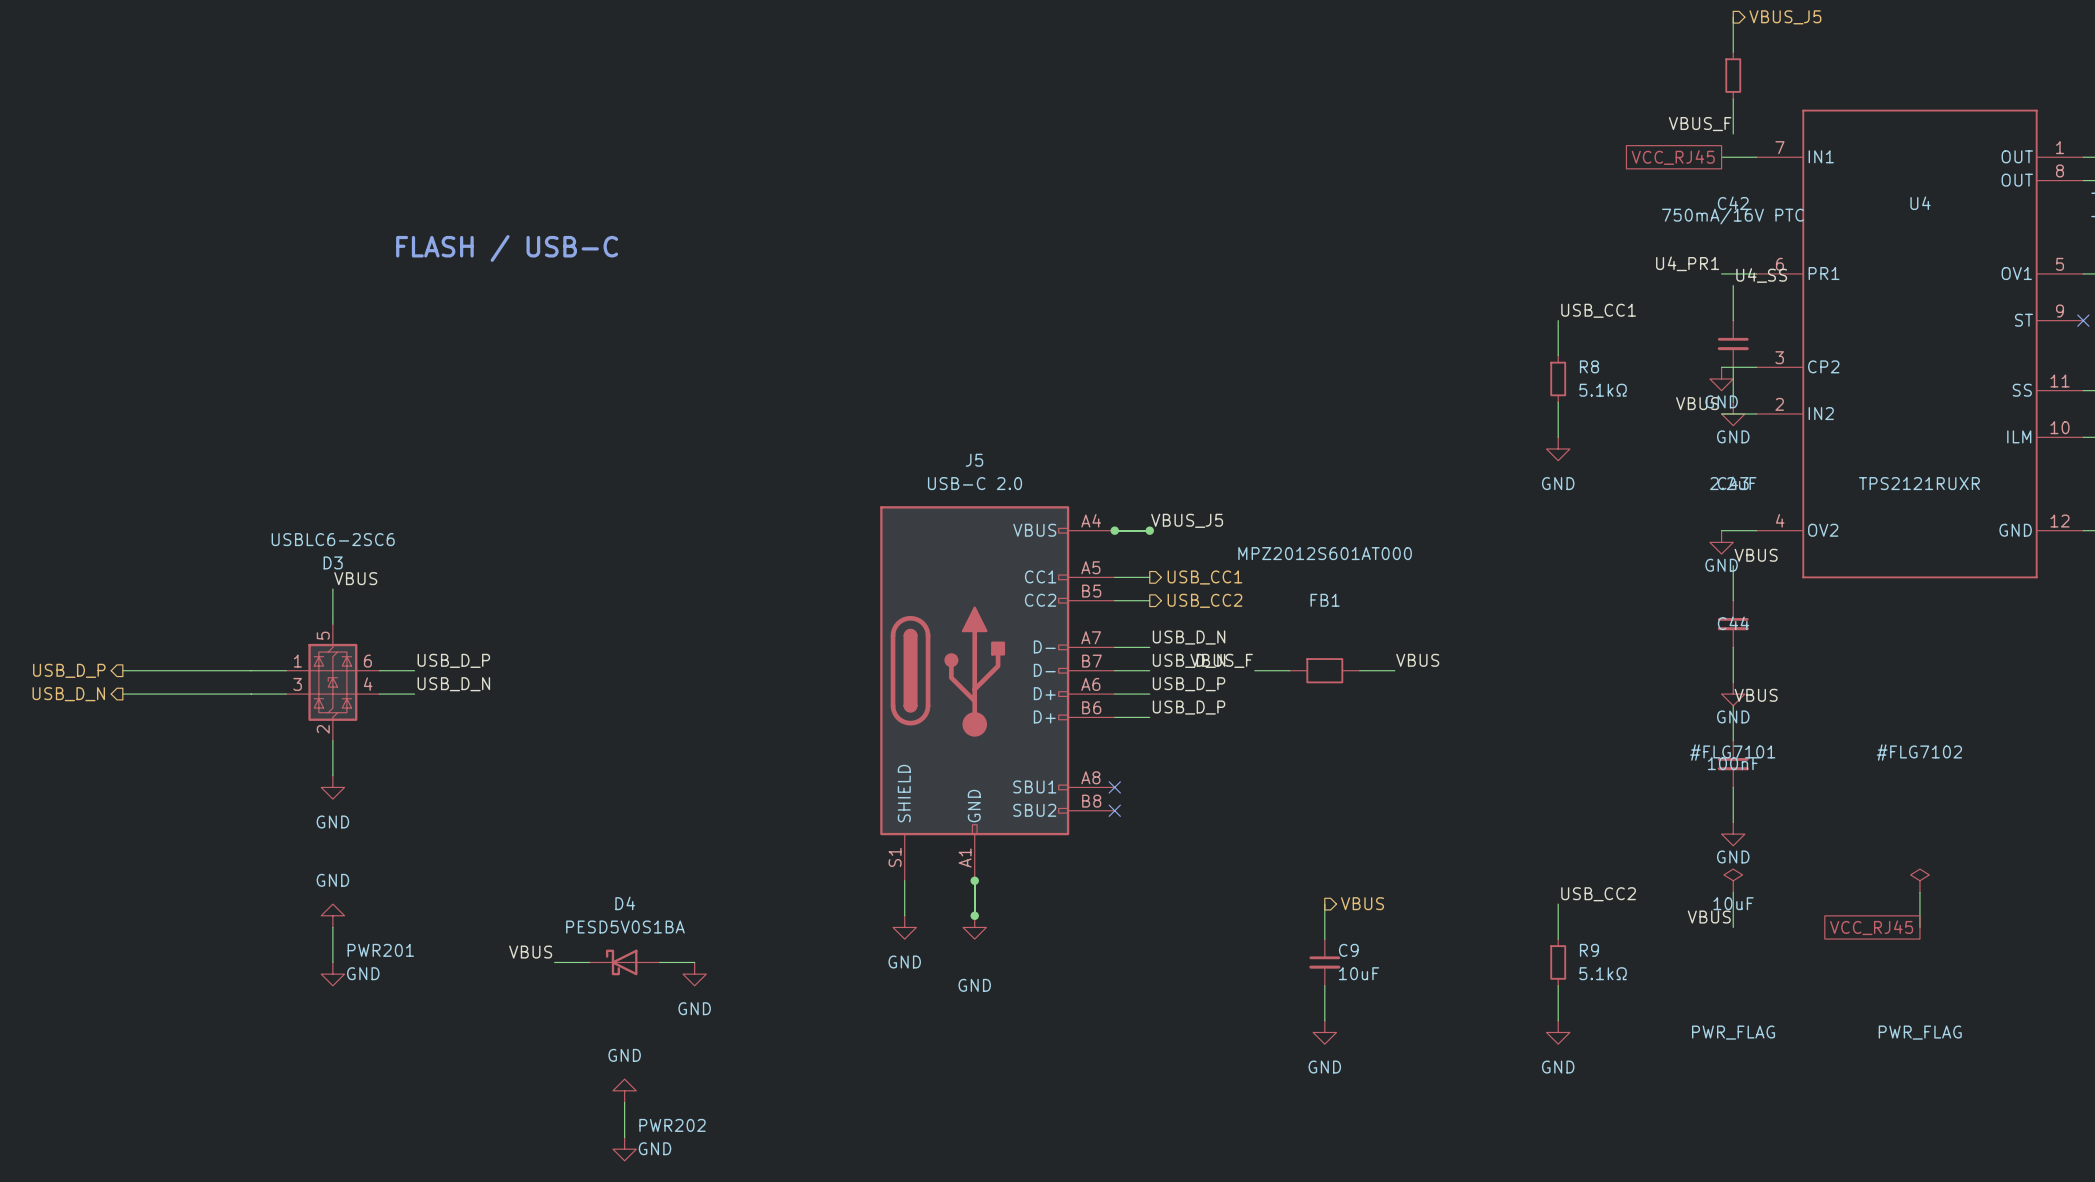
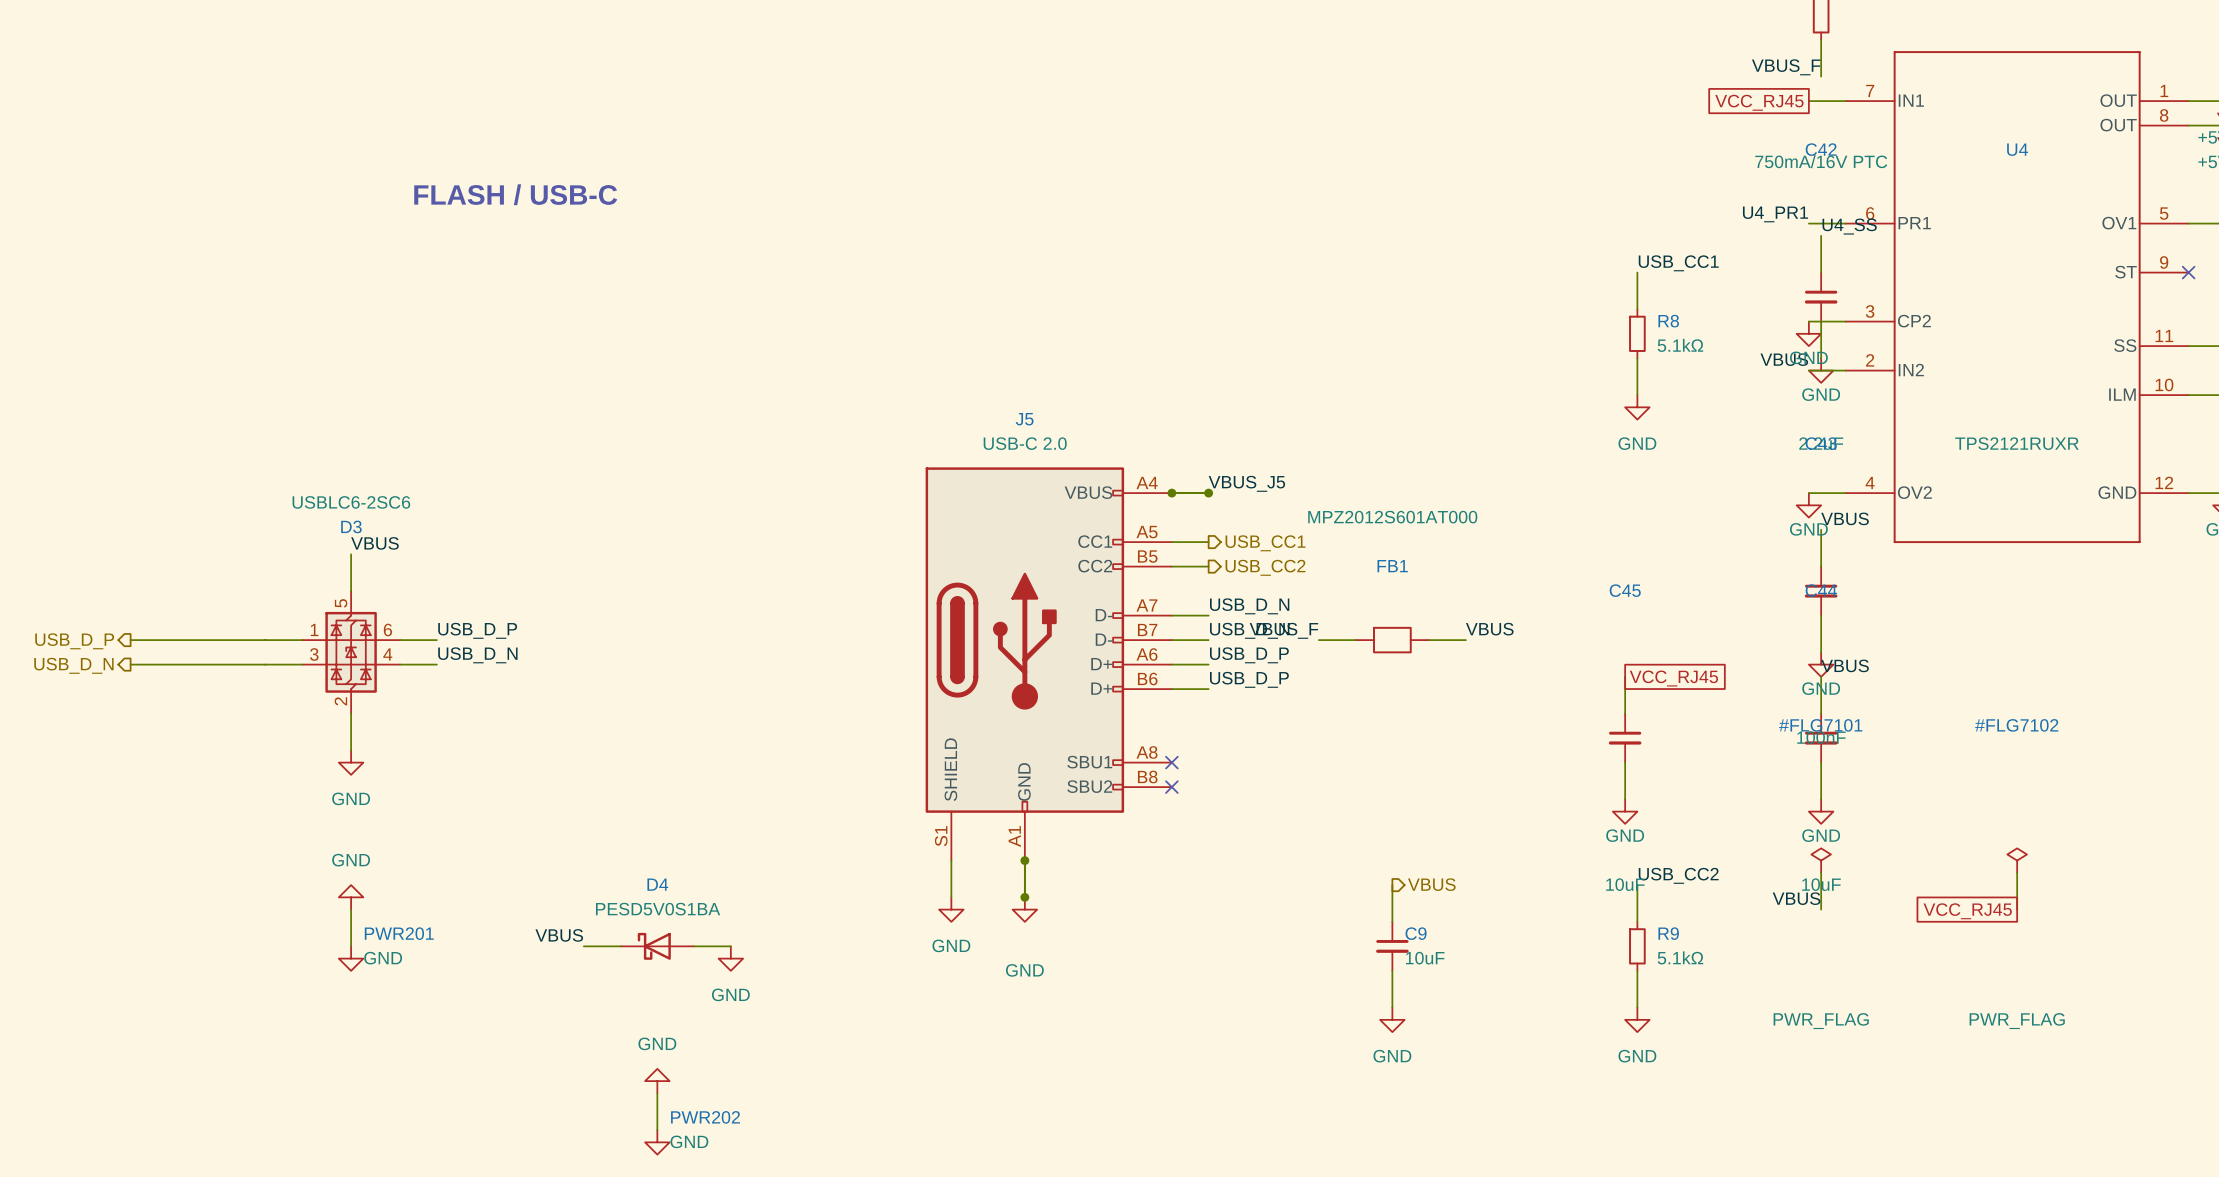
wire: none -> (1625, 676) (1625, 713)
global label: none -> VCC_RJ45 (1673, 678)
C45: none -> 10uF (1625, 738)
wire: none -> (1625, 762) (1625, 799)
power symbol: none -> GND (1625, 811)

